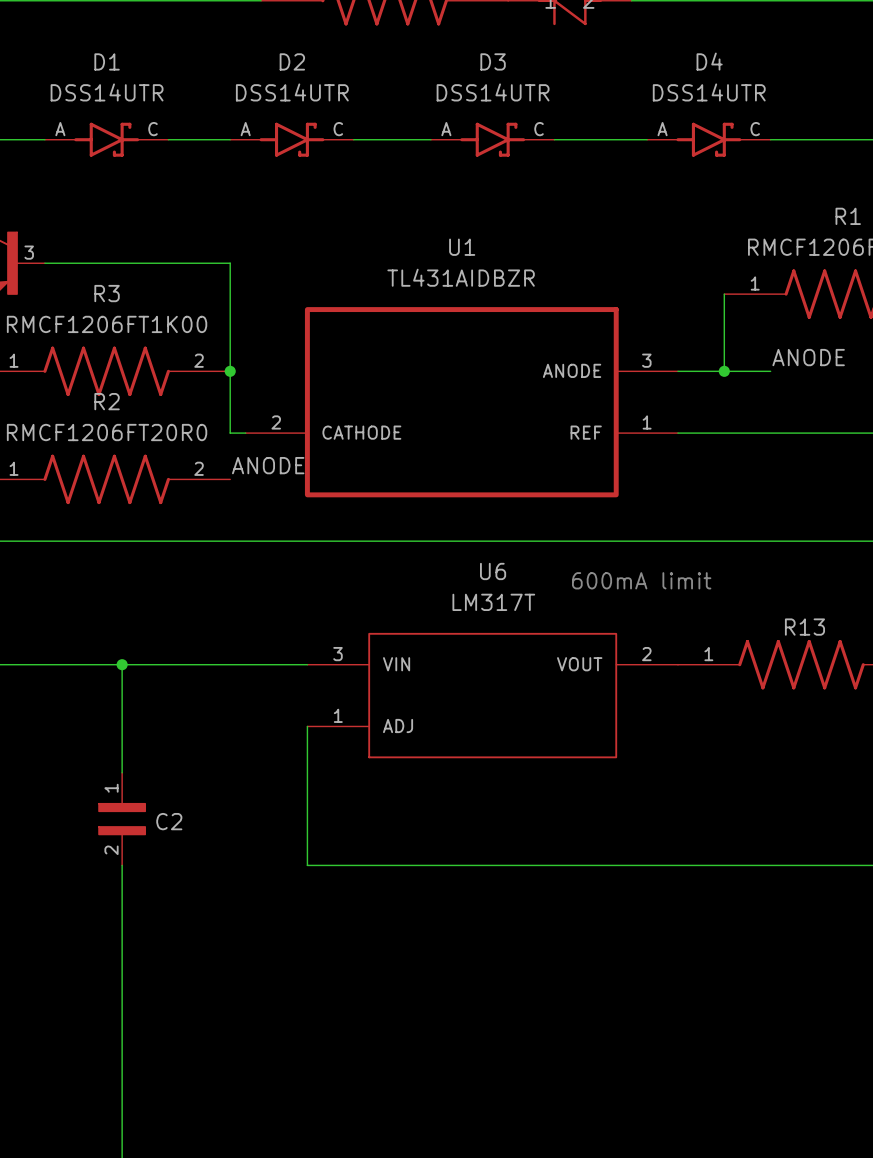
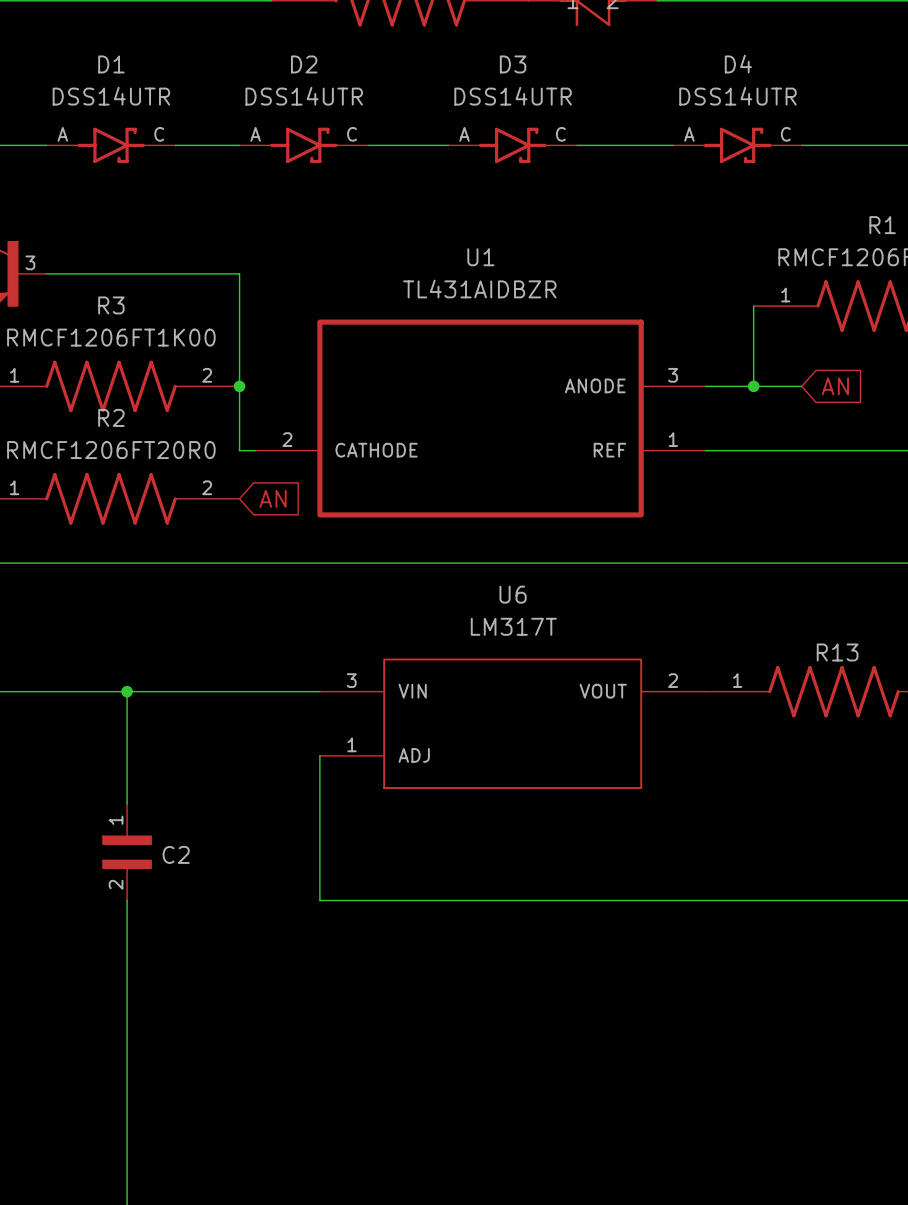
label: ANODE (808, 357) -> none
global label: none -> AN (835, 386)
label: ANODE (268, 465) -> none
global label: none -> AN (273, 498)
text: 600mA limit (641, 580) -> none

